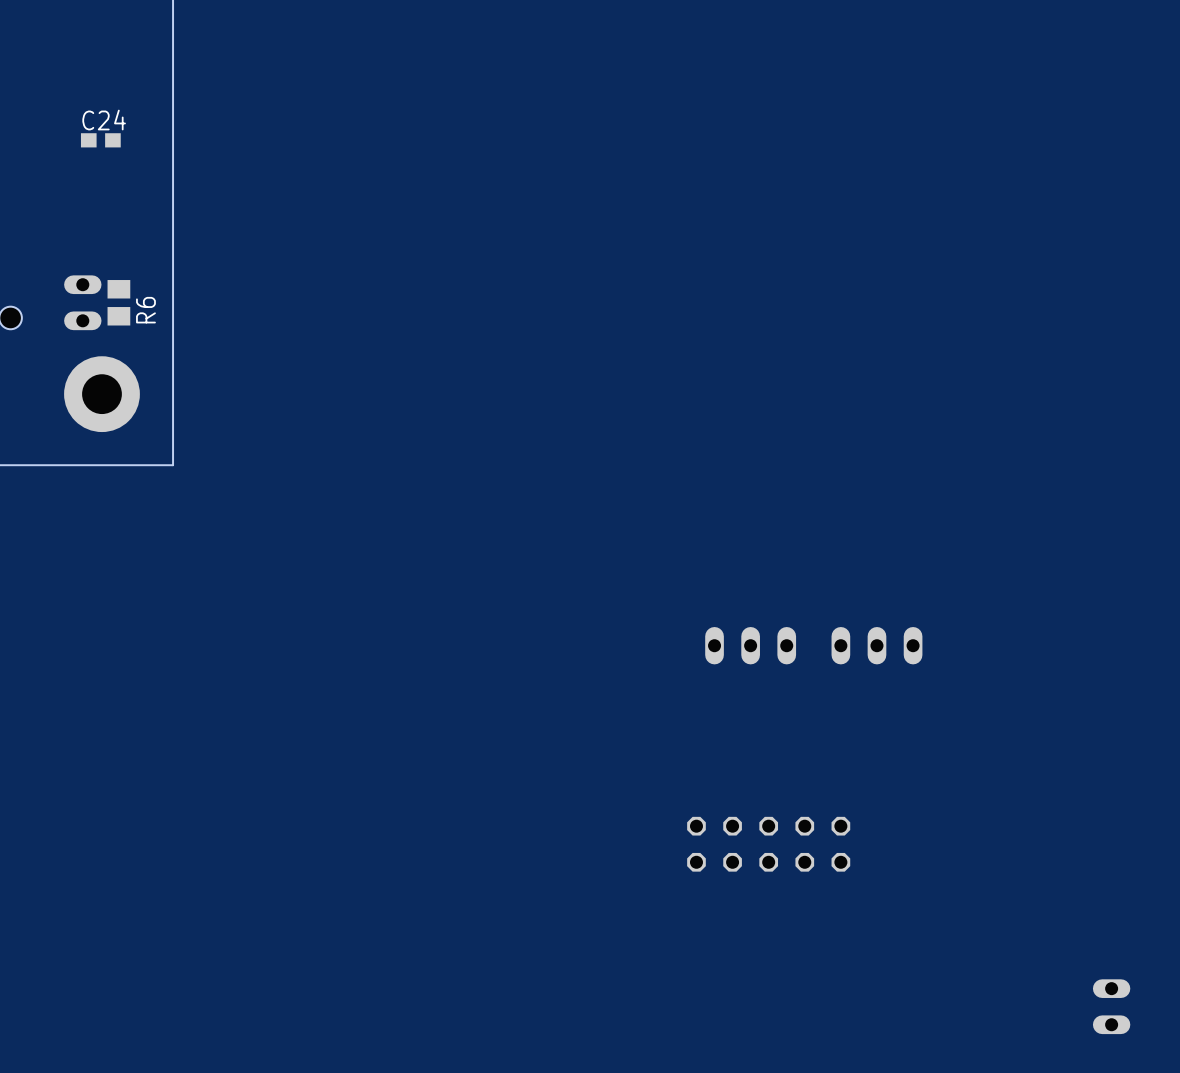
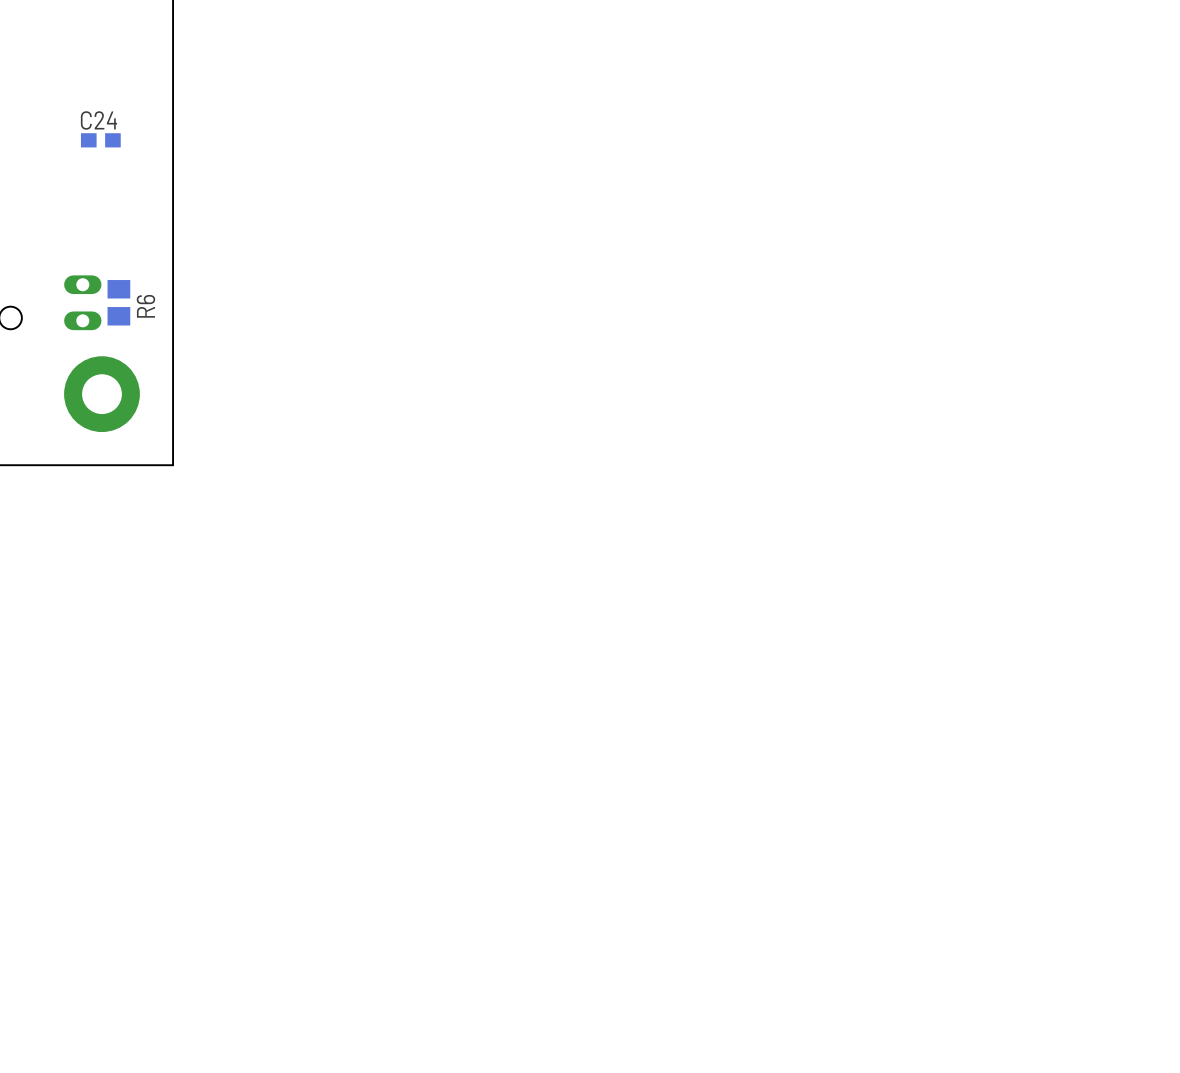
part: (750, 645) -> none
part: (876, 645) -> none
part: (768, 844) -> none
part: (1111, 1006) -> none

